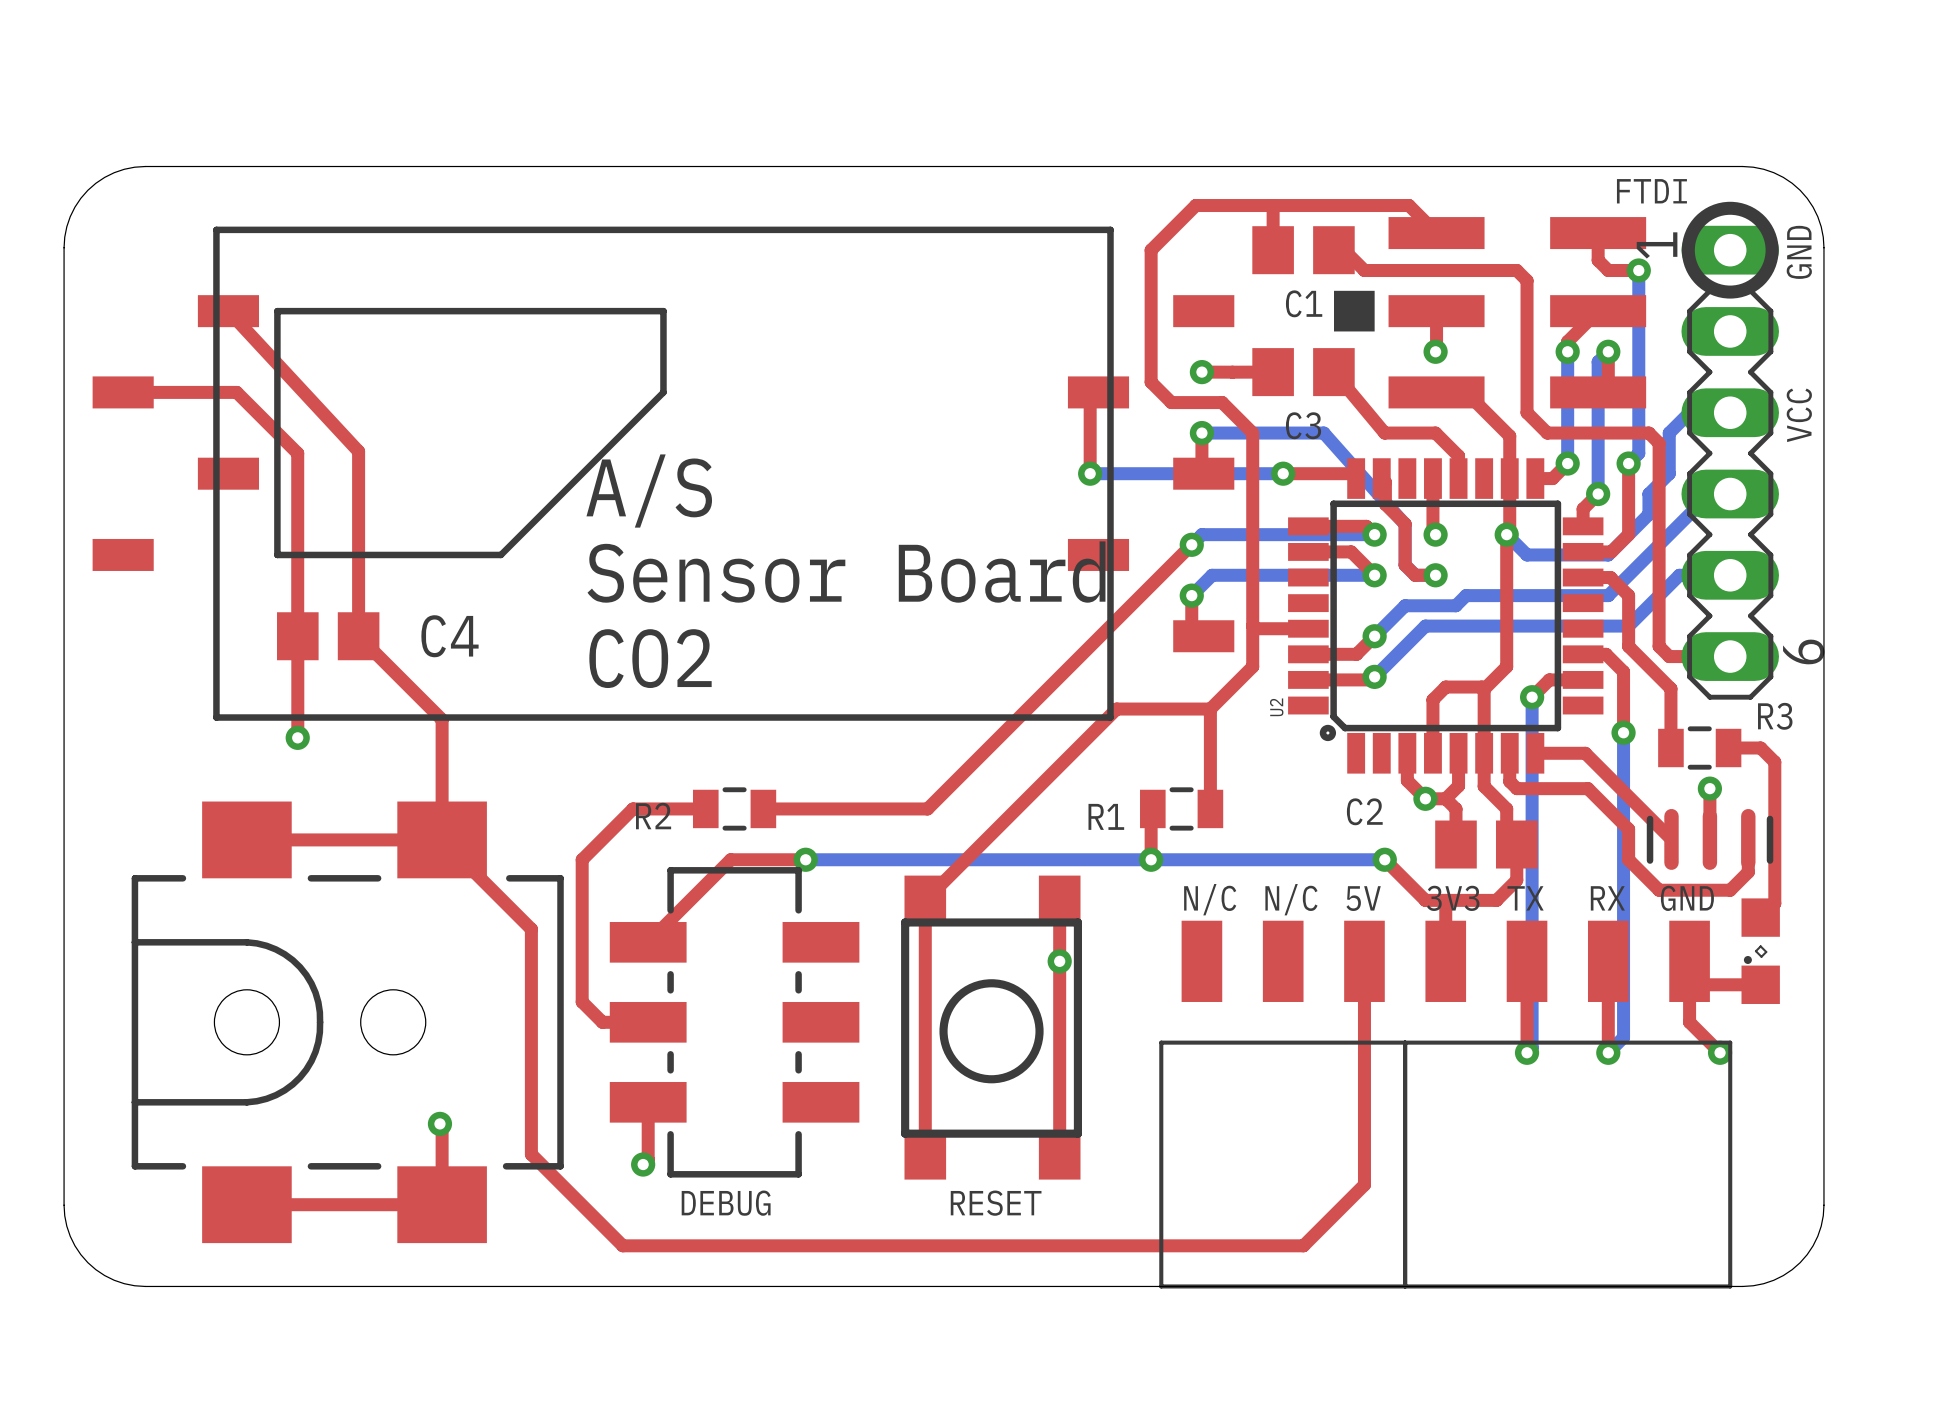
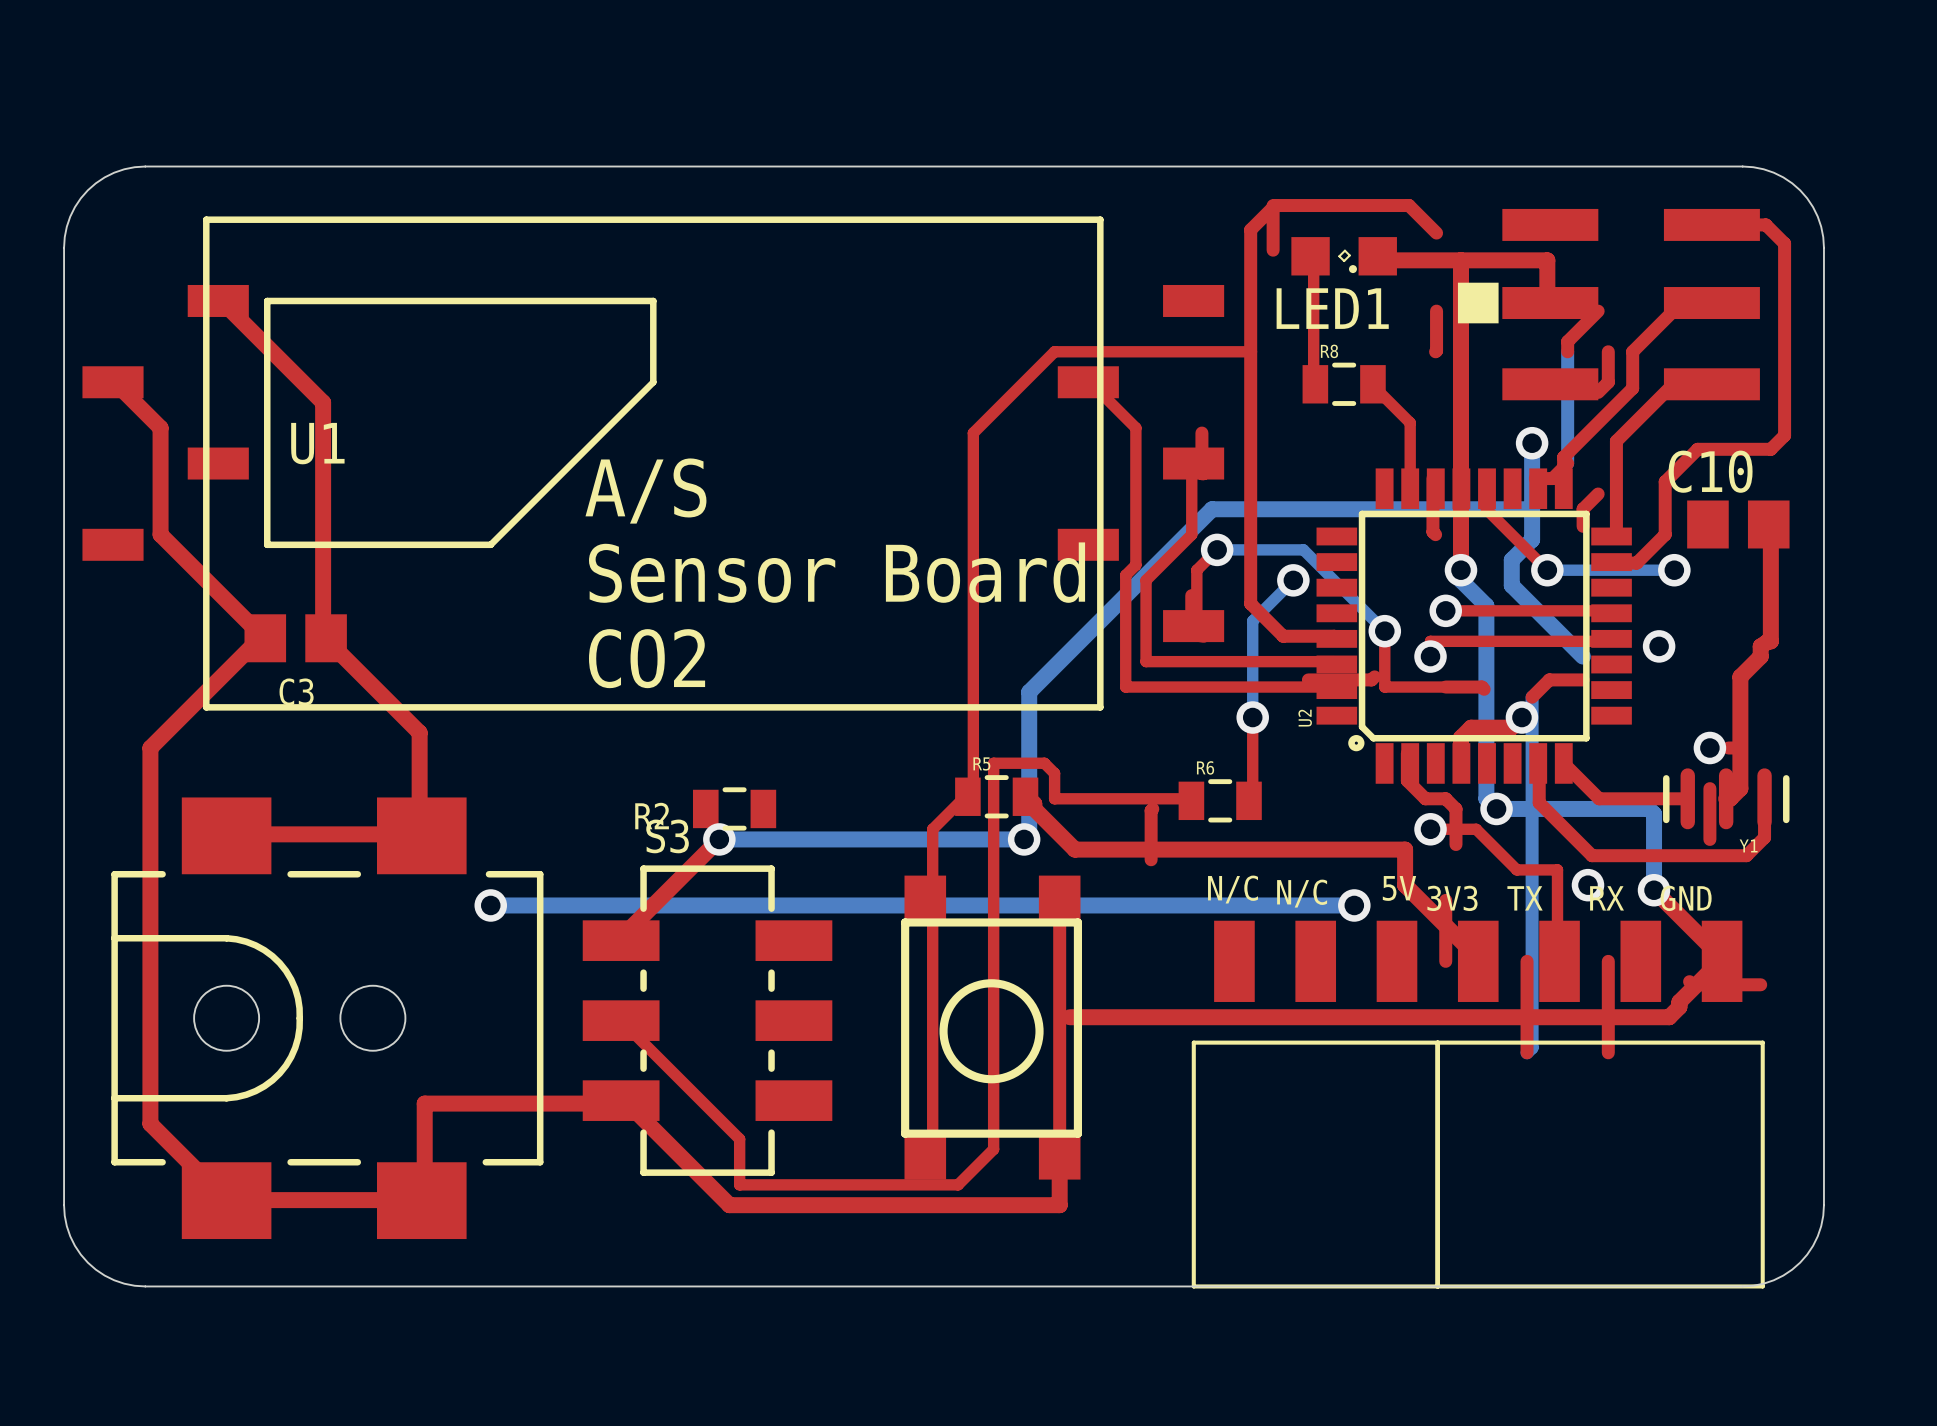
text: FTDI (1651, 191) -> none
drawing: [1681, 201, 1779, 299] -> none
top track: (1275, 205) (1195, 205) (1151, 250) (1151, 382) (1171, 402) (1222, 402) (1252, 433) (1252, 666) (1210, 709) -> (1275, 205) (1250, 229) (1250, 603) (1283, 636) (1334, 636) (1336, 638)
top track: none -> (1711, 224) (1765, 224) (1784, 243) (1784, 435) (1770, 449) (1697, 449) (1665, 481) (1665, 534) (1636, 563) (1611, 562)
top track: (1598, 233) (1598, 260) (1608, 270) (1638, 270) -> none
C1: (1303, 250) -> none
top track: (1333, 250) (1334, 240) (1364, 270) (1516, 270) (1527, 280) (1527, 412) (1547, 433) (1648, 433) (1659, 443) (1659, 646) (1669, 656) (1730, 656) -> none
text: GND (1799, 252) -> none
top track: none -> (1310, 256) (1313, 260) (1313, 382) (1315, 384)
LED1: none -> (1344, 256)
top track: none -> (1377, 256) (1379, 260) (1547, 260) (1547, 300) (1550, 303)
top track: none -> (1460, 260) (1460, 570)
bottom track: (1638, 270) (1638, 453) (1628, 463) -> none
via: (1638, 270) -> none
top track: none -> (218, 300) (221, 300) (323, 402) (323, 631) (328, 641) (419, 732) (419, 834) (421, 835) (226, 835)
top track: none -> (1711, 303) (1681, 303) (1632, 351) (1632, 388) (1563, 457) (1563, 488)
top track: (228, 311) (358, 451) (358, 636) (442, 719) (442, 839) -> none
drawing position: (1354, 311) -> (1478, 303)
part position: (1517, 312) -> (1631, 304)
top track: none -> (1250, 351) (1054, 351) (973, 433) (973, 788) (967, 796) (963, 798) (932, 829) (932, 890) (930, 892) (932, 895) (932, 1144) (930, 1147)
via: (1435, 351) -> none
via: (1567, 351) -> none
bottom track: (1608, 351) (1598, 361) (1598, 494) -> none
via: (1608, 351) -> none
top track: (1201, 372) (1273, 372) -> none
via: (1201, 372) -> none
C3 position: (1303, 372) -> (295, 638)
top track: (1333, 372) (1384, 433) (1435, 433) (1458, 456) (1458, 478) -> none
top track: none -> (113, 382) (160, 427) (160, 534) (265, 638) (257, 641) (150, 748) (150, 1123) (226, 1200)
top track: none -> (1088, 382) (1135, 427) (1135, 565) (1125, 575) (1125, 687) (1334, 687) (1336, 690)
R8: none -> (1344, 384)
top track: none -> (1372, 384) (1410, 422) (1410, 488)
top track: none -> (1711, 384) (1673, 384) (1616, 441) (1616, 531) (1611, 536)
top track: (123, 392) (236, 392) (297, 453) (297, 737) -> none
top track: (1098, 392) (1090, 400) (1090, 473) -> none
top track: (1436, 392) (1466, 392) (1509, 436) (1509, 531) (1506, 534) (1506, 666) (1484, 689) (1484, 786) (1506, 808) (1506, 834) (1516, 844) (1516, 880) (1496, 900) (1425, 900) (1384, 859) -> none
bottom track: (1730, 412) (1689, 412) (1669, 433) (1669, 473) (1648, 494) (1648, 514) (1608, 554) (1527, 554) (1506, 534) -> none
text: VCC (1799, 415) -> none
bottom track: (1201, 433) (1323, 433) (1405, 524) (1405, 565) (1415, 575) (1435, 575) -> none
via: (1201, 433) -> none
U1 name: none -> U1 (317, 443)
bottom track: none -> (1532, 443) (1532, 539) (1511, 560) (1511, 585) (1582, 656)
via: none -> (1532, 443)
part: (1730, 453) -> none
top track: none -> (1193, 463) (1191, 463) (1191, 534) (1146, 580) (1146, 661) (1334, 661) (1336, 664)
via: (1567, 463) -> none
top track: (1628, 463) (1628, 534) (1611, 551) (1583, 551) -> none
via: (1628, 463) -> none
U1 position: (663, 473) -> (653, 463)
bottom track: (1090, 473) (1283, 473) -> none
via: (1090, 473) -> none
top track: (1283, 473) (1351, 473) (1356, 478) -> none
via: (1283, 473) -> none
top track: (1381, 478) (1385, 482) (1385, 504) (1405, 523) (1405, 565) (1415, 575) (1435, 575) -> none
top track: none -> (1487, 488) (1486, 509) (1547, 570)
via: (1598, 494) -> none
bottom track: (1730, 494) (1709, 494) (1608, 595) (1466, 595) (1455, 605) (1405, 605) (1374, 636) -> none
bottom track: none -> (1532, 509) (1212, 509) (1029, 692) (1029, 834) (1024, 839) (719, 839)
C10: none -> (1738, 524)
top track: none -> (1768, 524) (1770, 524) (1770, 641) (1760, 646) (1760, 656) (1740, 676) (1740, 788) (1730, 798) (1726, 798)
top track: (1308, 526) (1366, 526) (1374, 534) -> none
bottom track: (1374, 534) (1201, 534) (1191, 544) -> none
via: (1374, 534) -> none
via: (1435, 534) -> none
via: (1506, 534) -> none
top track: (1191, 544) (927, 808) (763, 808) -> none
via position: (1191, 544) -> (1217, 549)
top track: none -> (1217, 549) (1196, 570) (1196, 626) (1193, 626)
bottom track: none -> (1217, 549) (1303, 549) (1384, 631)
top track: (1308, 551) (1351, 551) (1374, 575) -> none
bottom track: none -> (1460, 570) (1460, 580) (1486, 605) (1486, 798) (1496, 808) (1648, 808) (1654, 814) (1654, 890)
bottom track: none -> (1547, 570) (1674, 570)
via: none -> (1547, 570)
via: none -> (1674, 570)
bottom track: (1374, 575) (1212, 575) (1191, 595) -> none
via: (1374, 575) -> none
via position: (1435, 575) -> (1460, 570)
bottom track: (1730, 575) (1679, 575) (1628, 626) (1425, 626) (1374, 676) -> none
top track: (1583, 577) (1610, 577) (1628, 595) (1628, 646) (1670, 688) (1670, 748) -> none
bottom track: none -> (1293, 580) (1252, 621) (1252, 717)
via: none -> (1293, 580)
via: (1191, 595) -> none
top track: none -> (1445, 610) (1608, 610) (1611, 613)
via: none -> (1445, 610)
U2 position: (1445, 615) -> (1474, 626)
via size: [1362, 624, 1387, 649] -> [1368, 614, 1402, 648]
top track: (1252, 626) (1255, 628) (1308, 628) -> none
C4: (328, 636) -> none
top track: (1374, 636) (1356, 654) (1308, 654) -> none
top track: none -> (1611, 638) (1608, 641) (1430, 641) (1430, 656)
via: none -> (1659, 646)
top track: (1583, 654) (1606, 654) (1623, 671) (1623, 732) -> none
via: none -> (1430, 656)
via: (1374, 676) -> none
top track: (1445, 687) (1432, 699) (1432, 753) -> (1445, 687) (1384, 687) (1384, 631)
via position: (1532, 697) -> (1521, 717)
top track: (1210, 709) (1210, 808) -> none
top track: (1210, 709) (1116, 709) (925, 900) (925, 1154) -> none
top track: none -> (1252, 717) (1252, 798) (1249, 800)
via: none -> (1252, 717)
top track: none -> (1521, 717) (1511, 727) (1471, 727) (1460, 737) (1460, 763)
bottom track: (1623, 732) (1623, 1037) (1608, 1052) -> none
via: (1623, 732) -> none
via: (297, 737) -> none
R3: (1699, 748) -> none
via: none -> (1709, 748)
top track: (1740, 748) (1760, 748) (1774, 762) (1774, 903) (1760, 917) -> none
top track: (1458, 753) (1458, 786) (1445, 798) -> none
top track: (1509, 753) (1509, 781) (1516, 788) (1587, 788) (1628, 829) (1628, 859) (1659, 890) (1730, 890) (1748, 872) (1748, 839) -> none
top track: (1535, 753) (1585, 753) (1671, 839) -> none
top track: none -> (1538, 763) (1539, 802) (1592, 855) (1746, 855) (1764, 837) (1764, 798)
top track: none -> (1563, 763) (1599, 798) (1687, 798)
via: (1709, 788) -> none
R5: none -> (996, 796)
top track: none -> (1025, 796) (1034, 803) (1034, 808) (1074, 849) (1405, 849) (1405, 885) (1476, 956) (1476, 961) (1478, 961)
via: (1425, 798) -> none
Y1: none -> (1726, 798)
top track: none -> (1191, 800) (1186, 798) (1054, 798) (1054, 773) (1044, 763) (993, 763) (993, 1149) (958, 1184) (739, 1184) (739, 1139) (621, 1020)
R6: none -> (1220, 800)
top track: (705, 808) (632, 808) (582, 859) (582, 1001) (602, 1022) (648, 1022) -> none
R1: (1181, 808) -> none
via: none -> (1496, 808)
top track: none -> (1430, 829) (1476, 829) (1516, 869) (1557, 869) (1557, 961) (1559, 961)
via: none -> (1430, 829)
S3 name: none -> S3 (667, 836)
top track: (246, 839) (442, 839) -> none
top track: (442, 839) (531, 929) (531, 1154) (622, 1245) (1303, 1245) (1364, 1184) (1364, 961) -> none
top track: none -> (719, 839) (622, 935) (621, 940)
via: none -> (719, 839)
via: none -> (1024, 839)
part: (1710, 839) -> none
C2: (1486, 844) -> none
top track: (805, 859) (730, 859) (648, 942) -> none
bottom track: (805, 859) (1384, 859) -> none
via: (805, 859) -> none
via: (1151, 859) -> none
via: (1384, 859) -> none
via: none -> (1587, 885)
top track: none -> (1654, 890) (1714, 951) (1714, 956) (1722, 961) (1679, 1001) (1679, 1007) (1669, 1017) (1069, 1017)
via: none -> (1654, 890)
text position: 5V (1363, 898) -> 5V (1399, 888)
text position: N/C (1210, 899) -> N/C (1233, 889)
text position: N/C (1291, 899) -> N/C (1302, 893)
bottom track: none -> (490, 905) (1354, 905)
via: none -> (490, 905)
via: none -> (1354, 905)
part: (1760, 951) -> none
via: (1059, 961) -> none
top track: (1689, 961) (1689, 1022) (1720, 1052) -> none
part position: (347, 1022) -> (327, 1018)
S3 position: (734, 1022) -> (707, 1020)
via: (1527, 1052) -> none
via: (1608, 1052) -> none
via: (1720, 1052) -> none
top track: (648, 1102) (648, 1159) (643, 1164) -> none
part position: (1283, 1104) -> (1315, 1104)
part position: (1567, 1104) -> (1600, 1104)
top track: (439, 1123) (442, 1126) (442, 1204) (246, 1204) -> none
via: (439, 1123) -> none
top track: none -> (1059, 1154) (1059, 1205) (729, 1205) (627, 1103) (621, 1100) (617, 1103) (424, 1103) (424, 1200) (226, 1200)
via: (643, 1164) -> none
text: DEBUG (726, 1203) -> none
text: RESET (996, 1203) -> none

